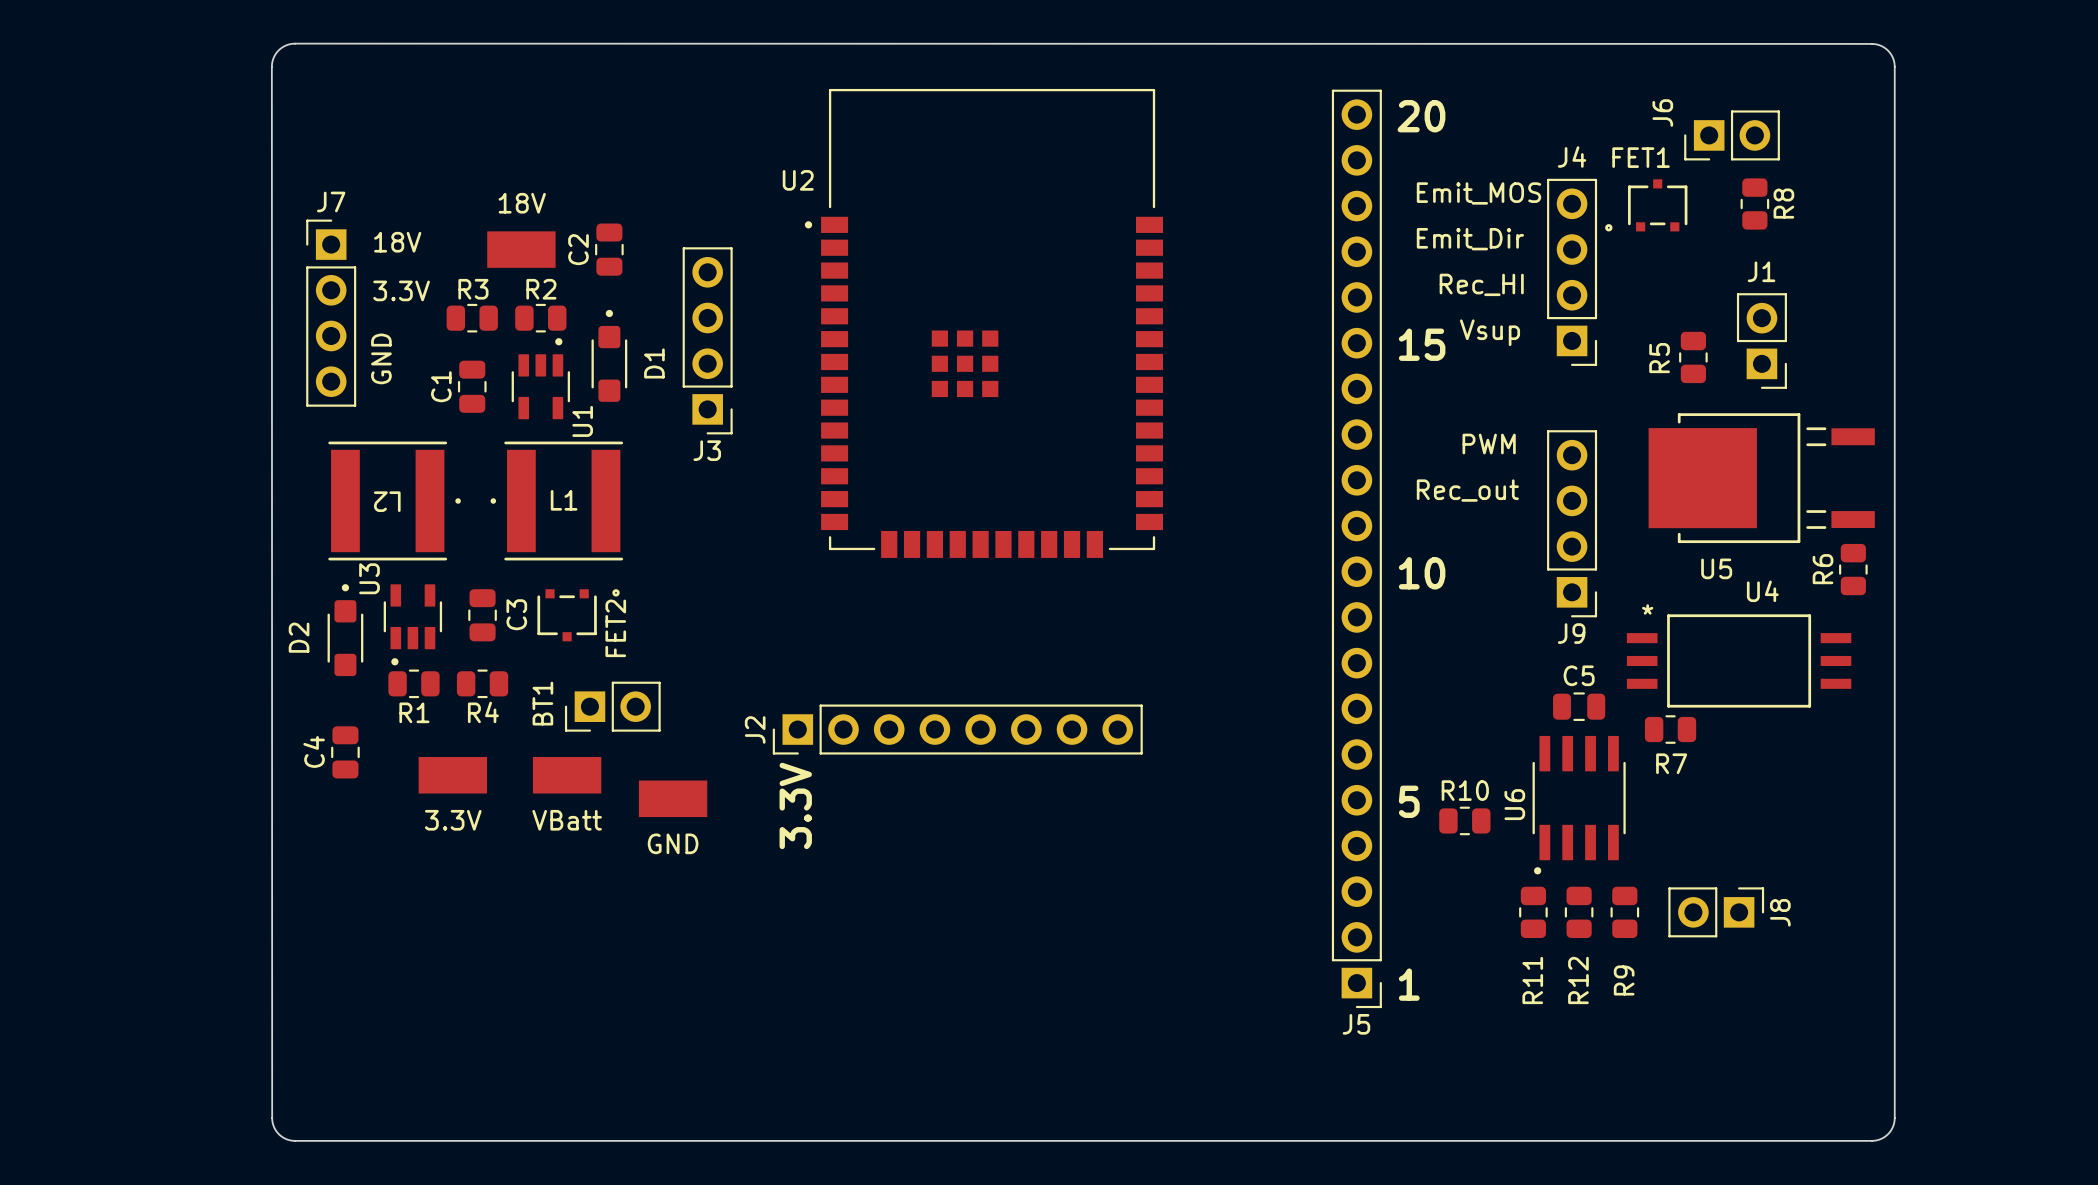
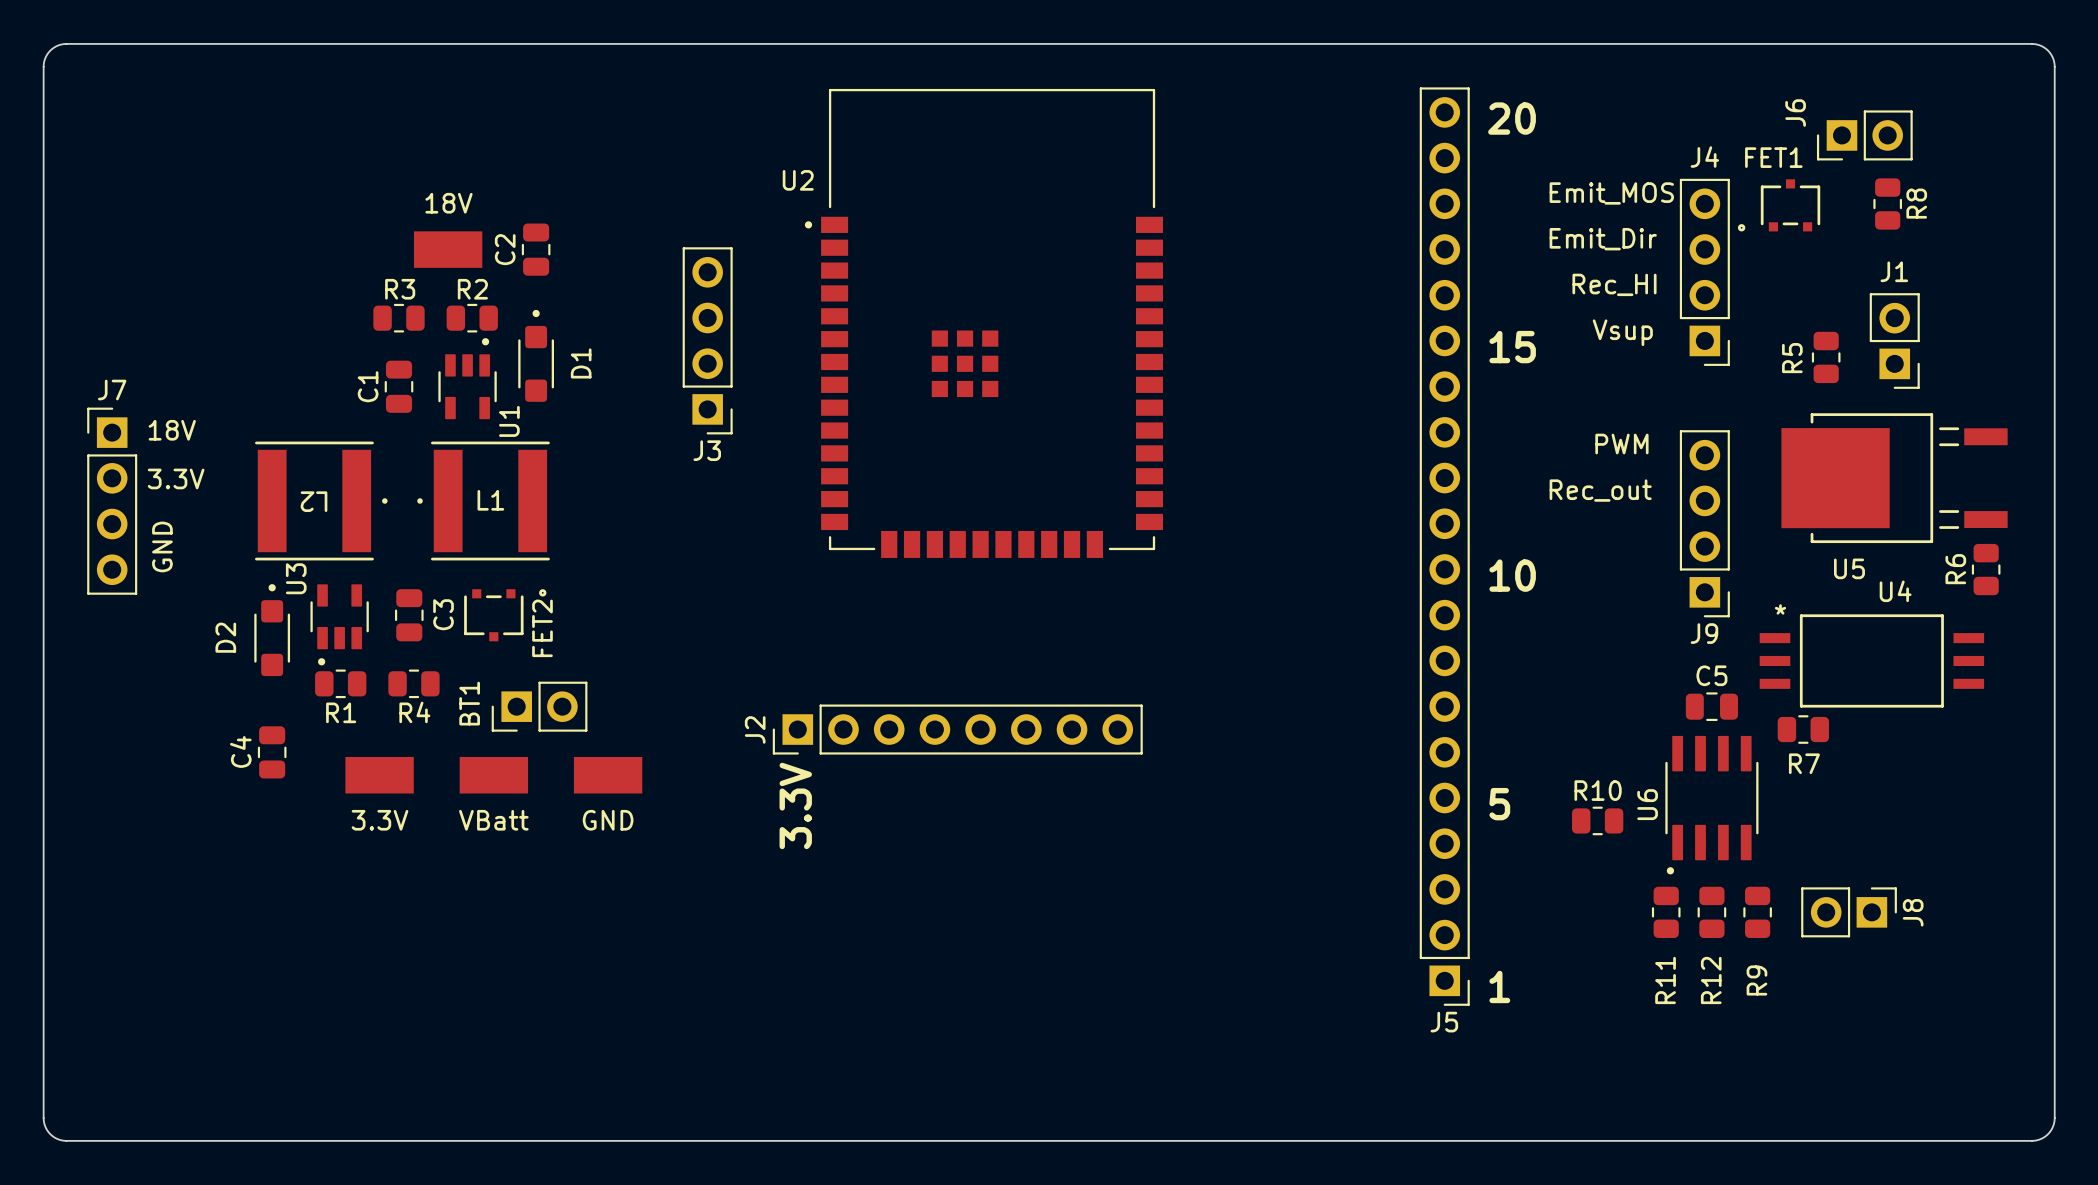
text position: 20 (1421, 116) -> 20 (1512, 118)
J6 position: (1732, 135) -> (1864, 135)
text position: Emit_MOS (1478, 193) -> Emit_MOS (1611, 193)
R8 position: (1754, 203) -> (1887, 203)
FET1 position: (1646, 205) -> (1779, 205)
text position: Emit_Dir (1470, 239) -> Emit_Dir (1603, 239)
text position: 18V (397, 242) -> 18V (172, 430)
18V position: (521, 249) -> (448, 249)
C2 position: (609, 249) -> (536, 249)
J4 position: (1572, 272) -> (1704, 272)
text position: Rec_HI (1481, 284) -> Rec_HI (1614, 284)
R3 name: R3 (473, 289) -> R2 (472, 289)
text position: 3.3V (401, 290) -> 3.3V (176, 478)
J7 position: (331, 313) -> (112, 501)
R3: none -> (399, 318)
R2: (540, 318) -> none
text position: Vsup (1489, 332) -> Vsup (1622, 332)
J1 position: (1761, 341) -> (1894, 341)
text position: 15 (1422, 344) -> 15 (1512, 347)
D1 position: (609, 355) -> (536, 355)
R5 position: (1693, 357) -> (1826, 357)
text position: GND (381, 358) -> GND (162, 546)
U1 position: (540, 378) -> (467, 378)
C1 position: (472, 386) -> (399, 386)
text position: PWM (1489, 444) -> PWM (1621, 444)
U5 position: (1761, 478) -> (1894, 478)
text position: Rec_out (1467, 490) -> Rec_out (1600, 490)
L2 position: (394, 501) -> (321, 501)
L1 position: (556, 501) -> (483, 501)
J9 position: (1572, 523) -> (1704, 523)
J5 position: (1356, 548) -> (1444, 546)
R6 position: (1853, 569) -> (1986, 569)
text position: 10 (1422, 573) -> 10 (1512, 575)
C3 position: (482, 615) -> (409, 615)
FET2 position: (578, 615) -> (505, 615)
U3 position: (412, 624) -> (339, 624)
D2 position: (345, 630) -> (272, 630)
U4 position: (1739, 660) -> (1871, 660)
R1: none -> (340, 683)
R4: (482, 683) -> none
BT1 position: (612, 706) -> (539, 706)
C5 position: (1579, 706) -> (1711, 706)
R1 name: R1 (414, 712) -> R4 (414, 712)
R7 position: (1670, 729) -> (1803, 729)
C4 position: (345, 752) -> (272, 752)
3.3V position: (452, 775) -> (379, 775)
VBatt position: (567, 775) -> (493, 775)
GND position: (673, 798) -> (608, 775)
text position: 5 (1409, 801) -> 5 (1499, 804)
U6 position: (1579, 805) -> (1711, 805)
R10 position: (1464, 820) -> (1597, 820)
R11 position: (1533, 912) -> (1666, 912)
R12 position: (1579, 912) -> (1711, 912)
R9 position: (1624, 912) -> (1757, 912)
J8 position: (1716, 912) -> (1849, 912)
text position: 1 (1409, 984) -> 1 (1499, 986)
board edge: (295, 1140) (287, 1139) (278, 1134) (274, 1127) (272, 1118) (271, 66) (273, 57) (278, 50) (286, 45) (295, 43) (1871, 43) (1884, 47) (1892, 56) (1894, 66) (1894, 1118) (1893, 1125) (1888, 1134) (1881, 1138) (1871, 1140) -> (295, 1140) (63, 1140) (52, 1135) (44, 1123) (43, 66) (48, 52) (61, 44) (2031, 43) (2044, 47) (2051, 54) (2054, 66) (2054, 1120) (2048, 1134) (2034, 1140) (1871, 1140)

